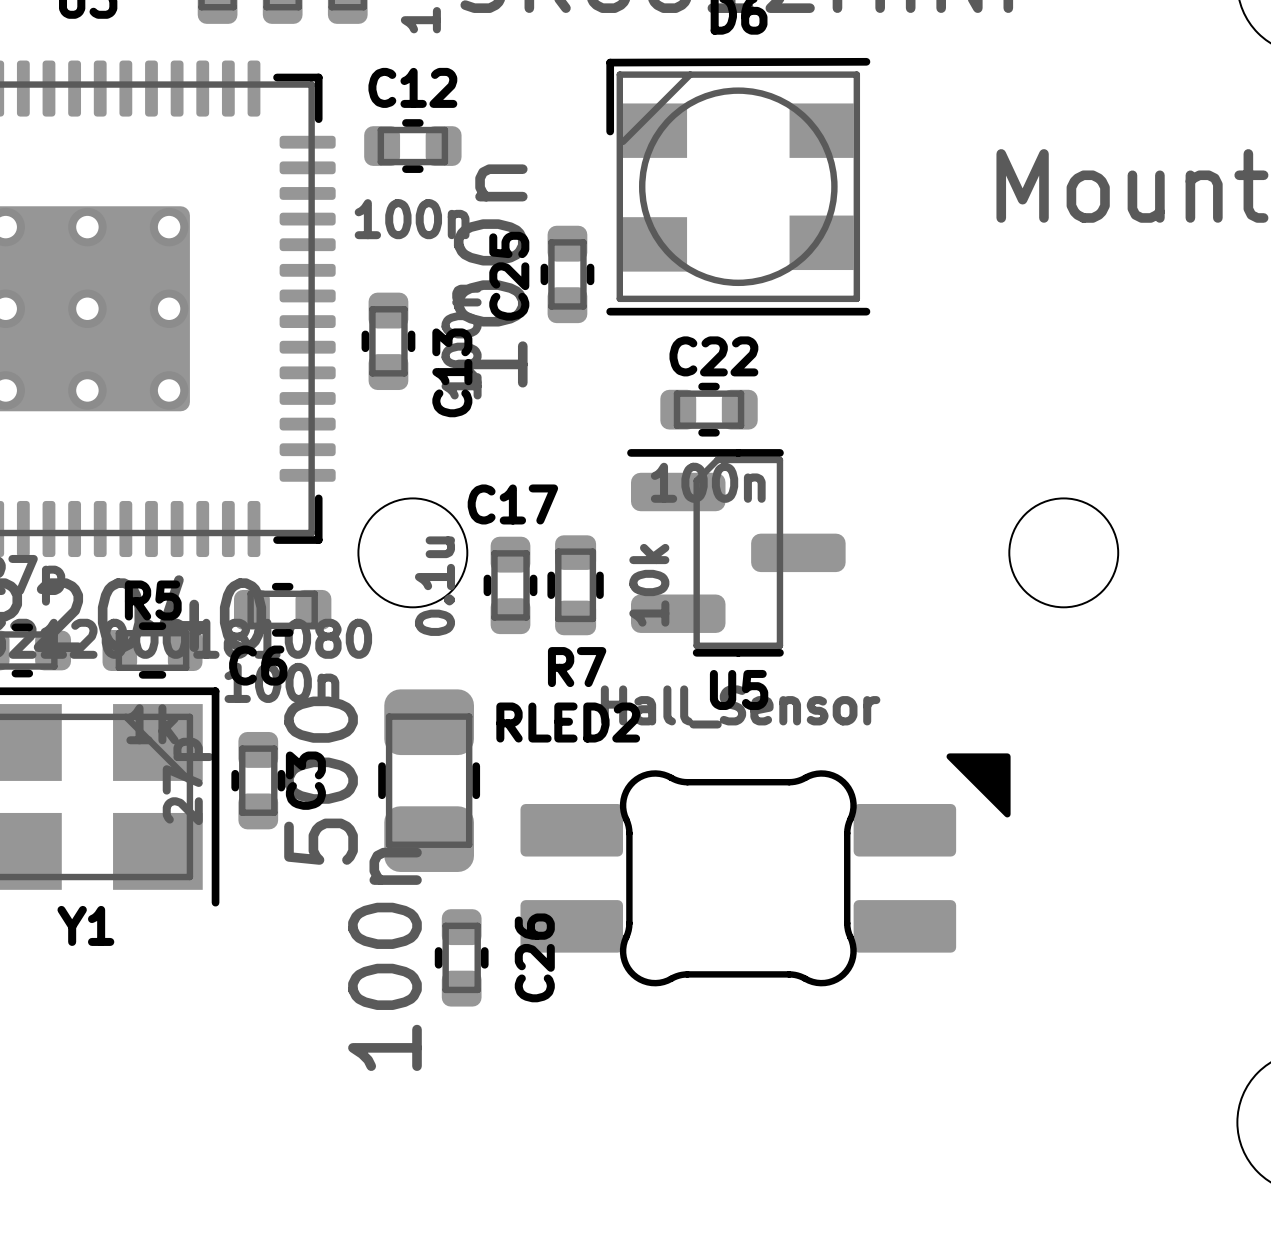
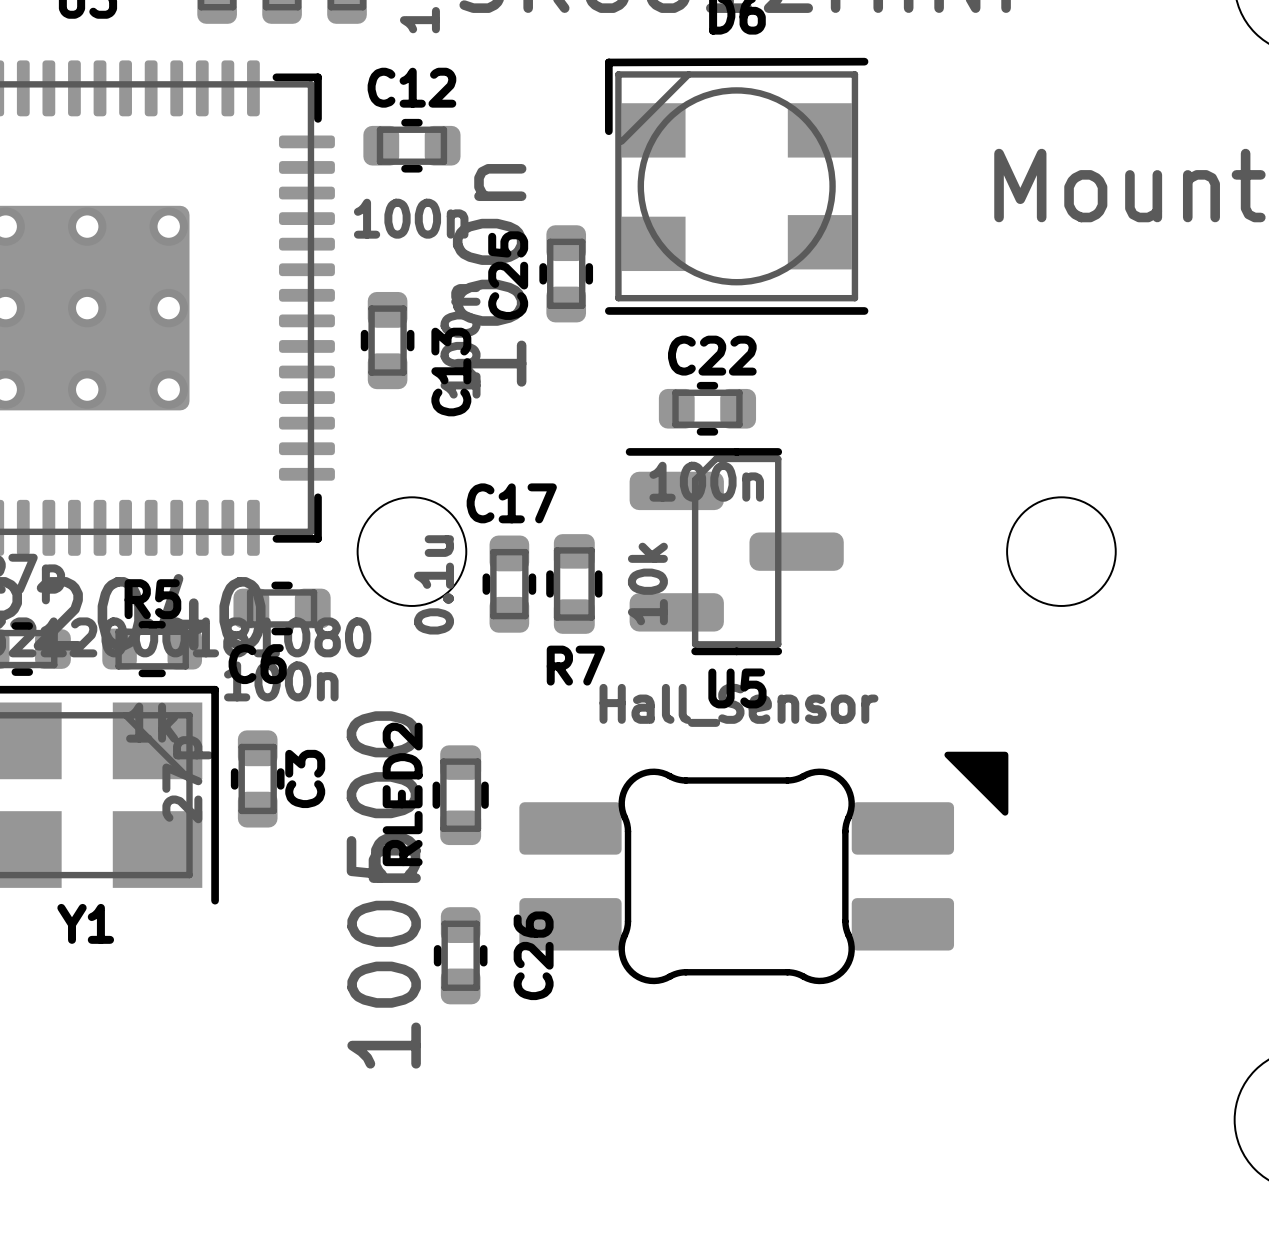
RLED2 footprint: [378, 689, 481, 872] -> [432, 745, 489, 846]
RLED2 name position: RLED2 (568, 722) -> RLED2 (402, 794)

